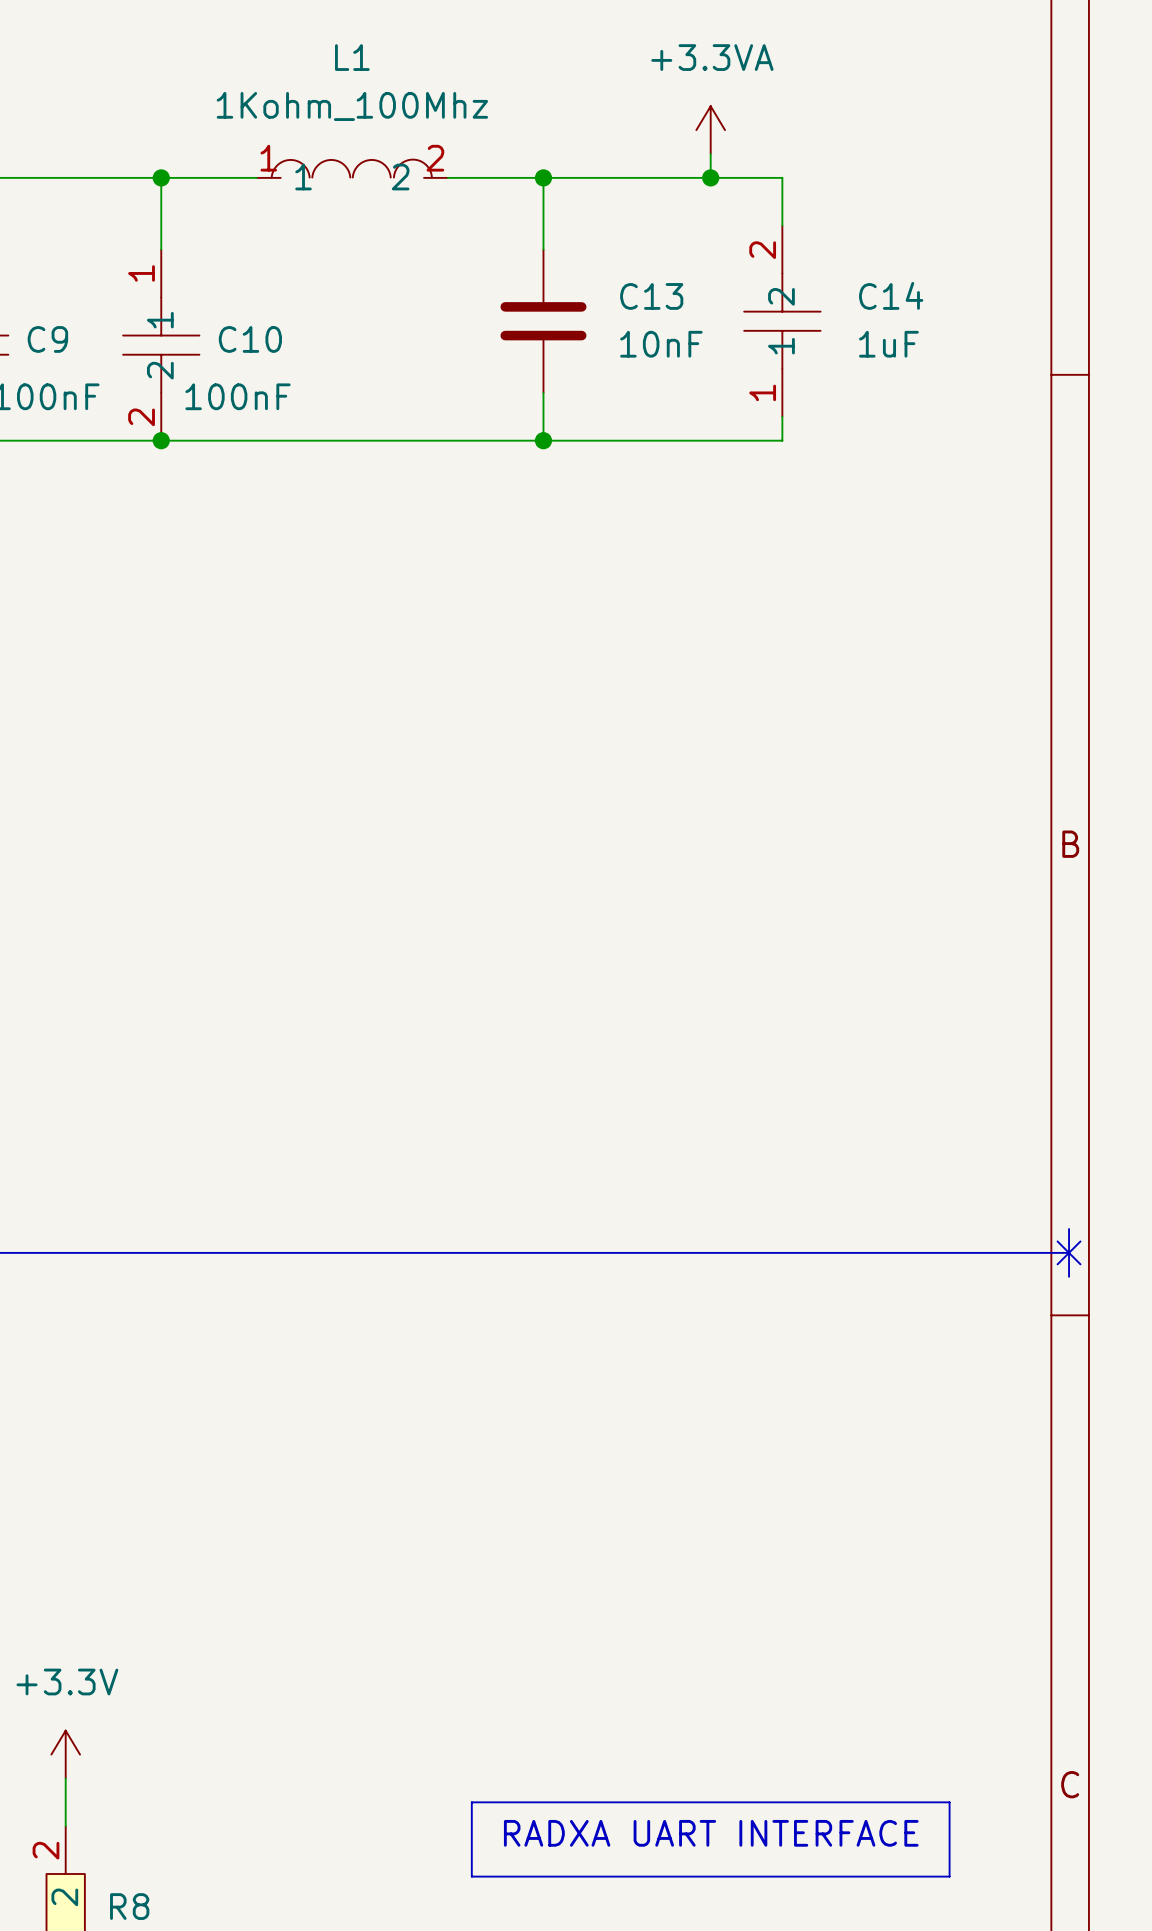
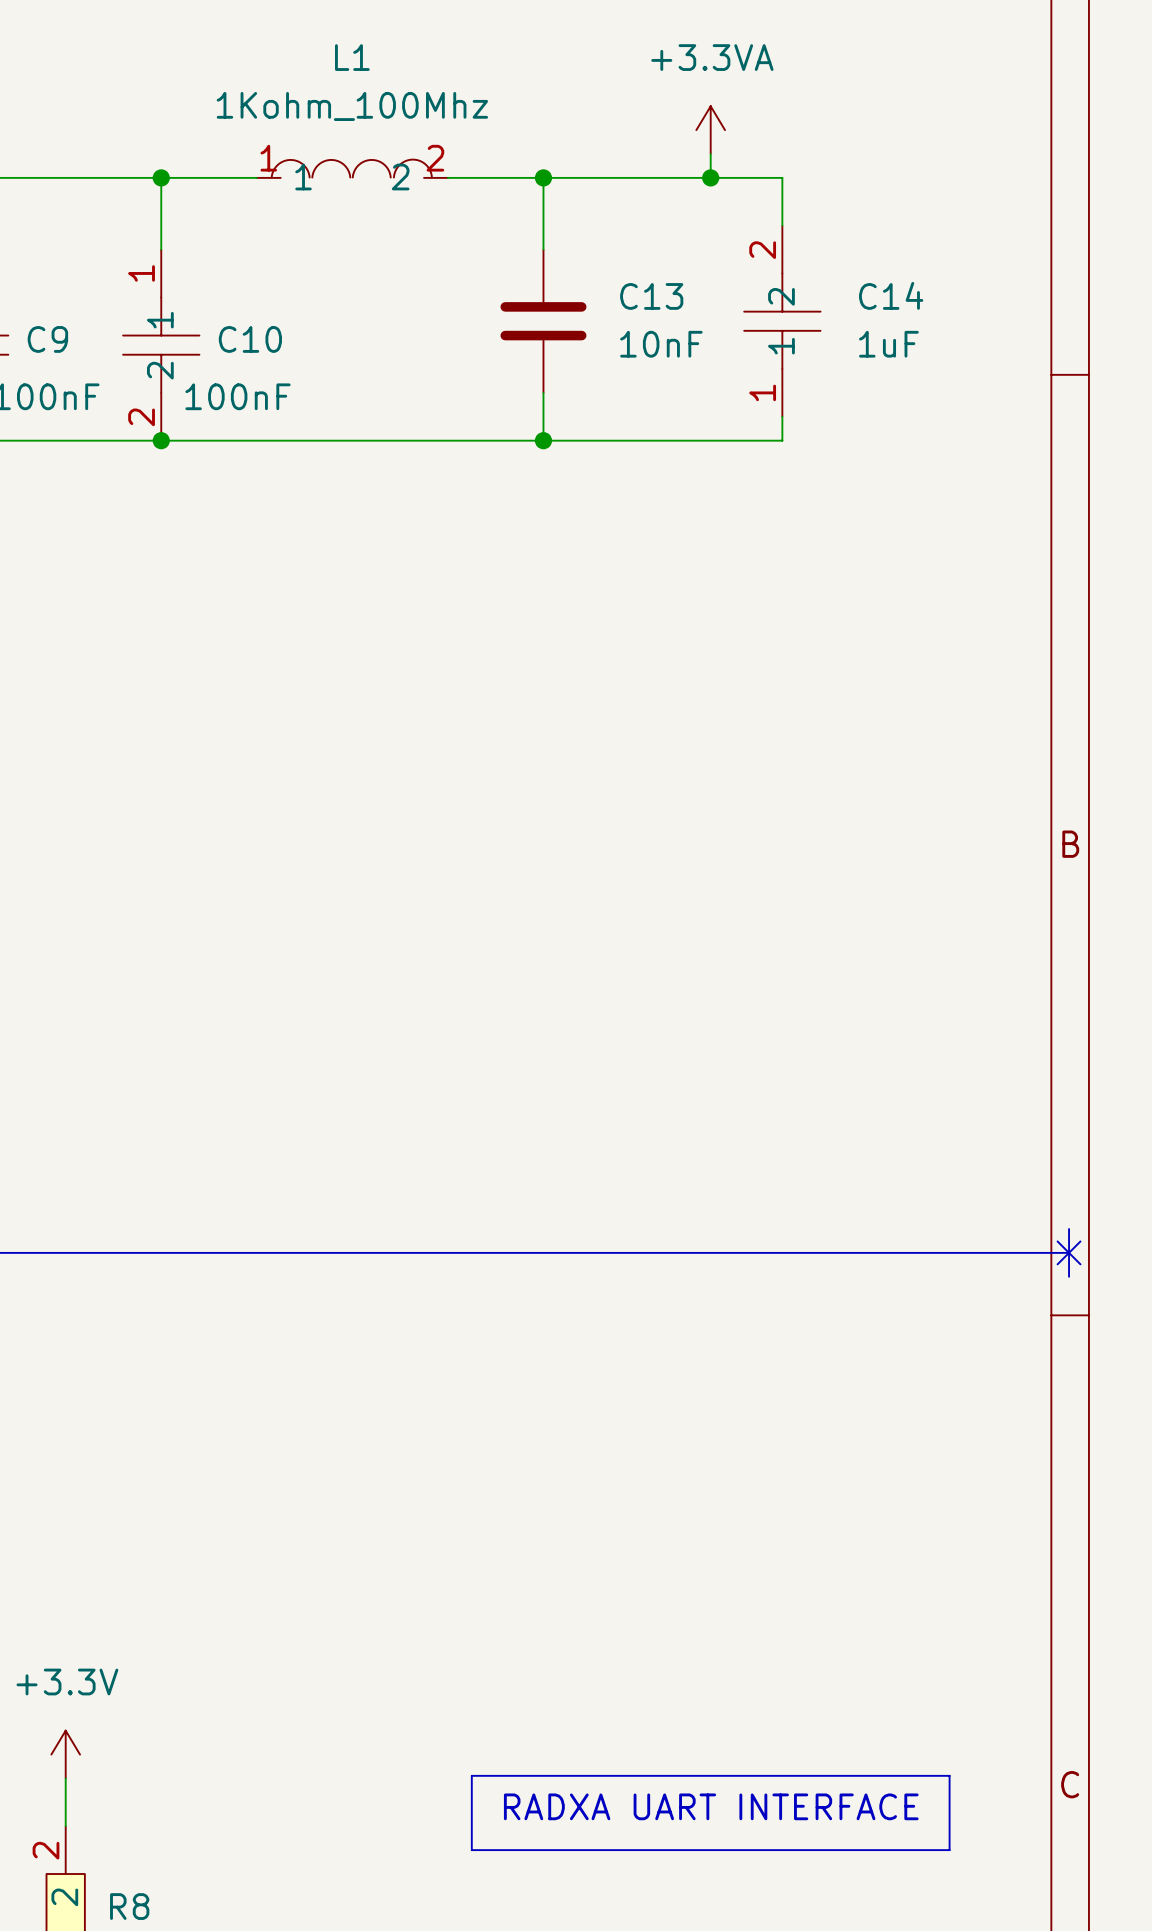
line: (471, 1802) (949, 1802) -> (471, 1802) (471, 1775) (949, 1775) (949, 1802)
text position: RADXA UART INTERFACE (711, 1833) -> RADXA UART INTERFACE (711, 1806)
line: (471, 1850) (471, 1876) (949, 1876) (949, 1850) -> (471, 1850) (949, 1850)

